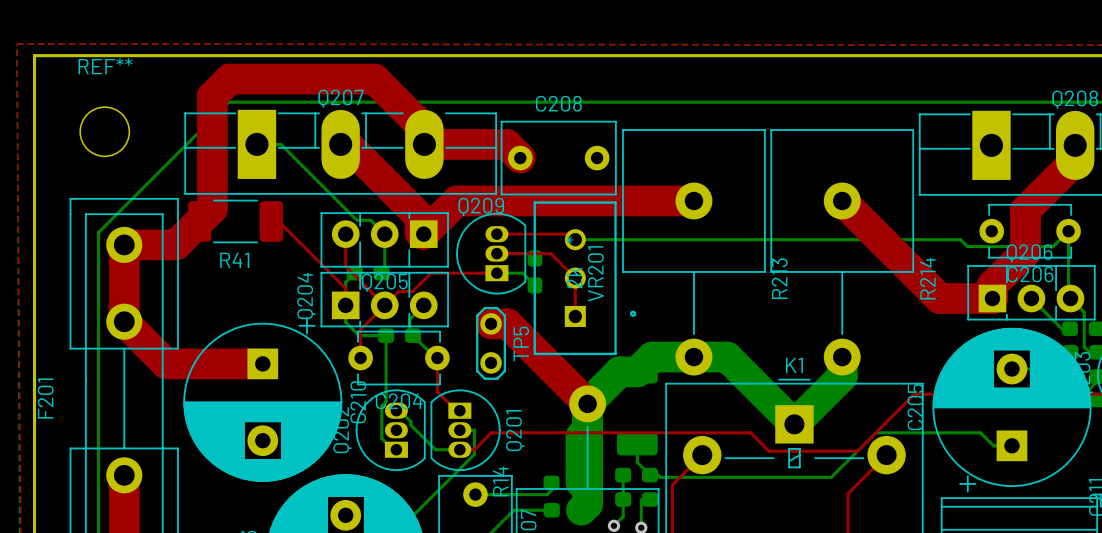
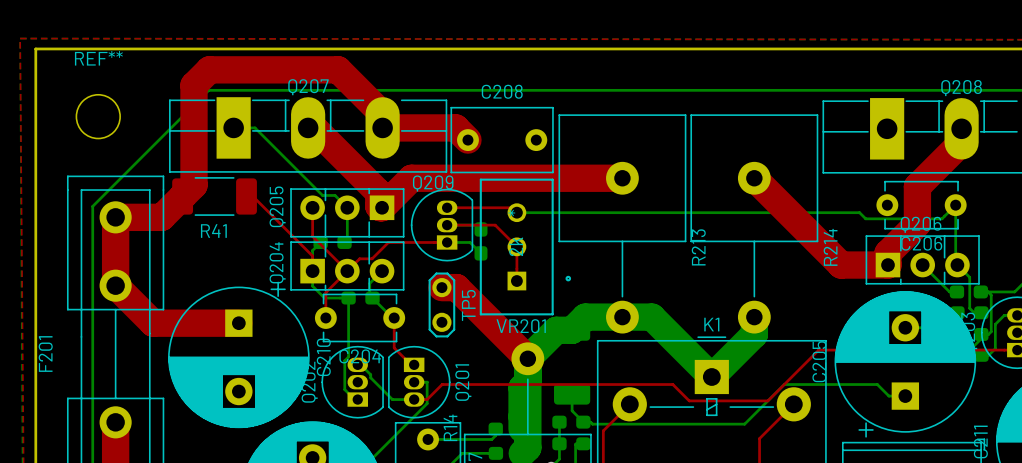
VR201 name rotation: 0° (595, 273) -> 90° clockwise (521, 326)
VR201 name position: VR201 (595, 273) -> VR201 (521, 326)
Q205 name rotation: 0° (384, 282) -> 90° counterclockwise (277, 206)
Q205 name position: Q205 (384, 282) -> Q205 (277, 206)

